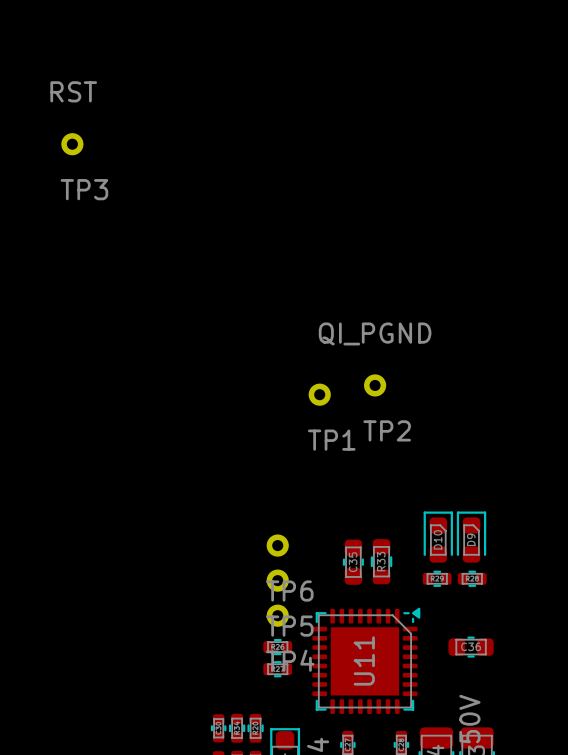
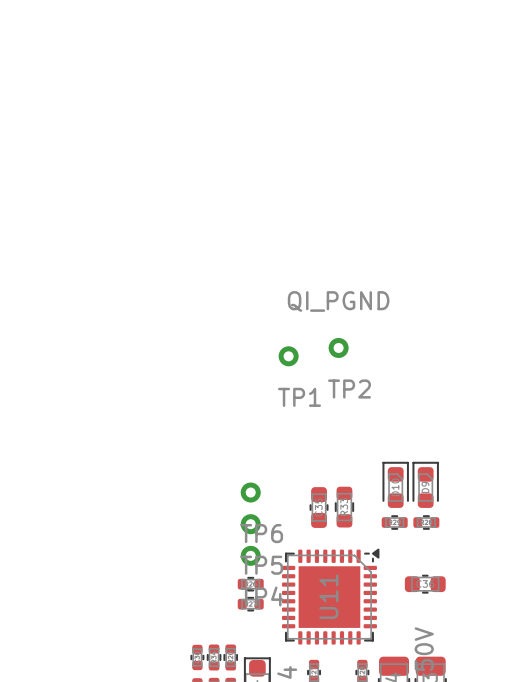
TP3: RST (72, 144) -> none

